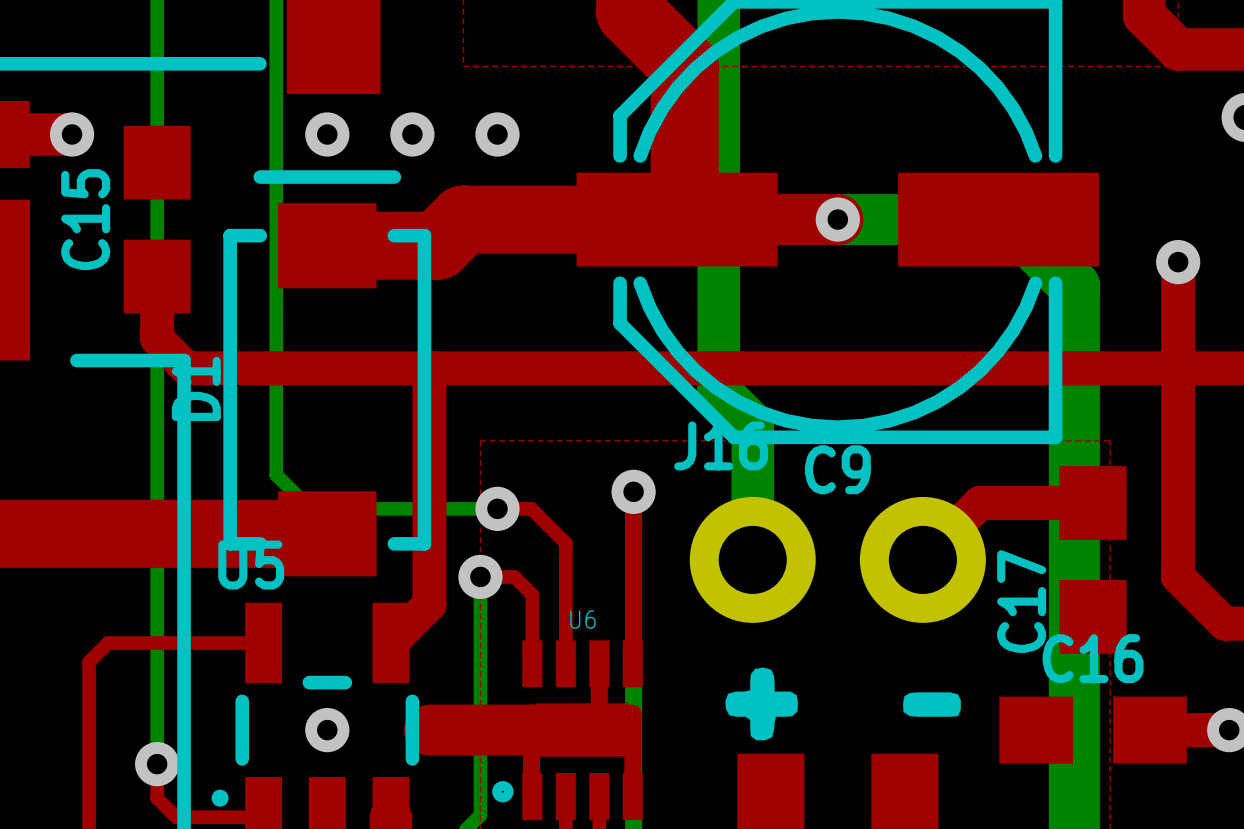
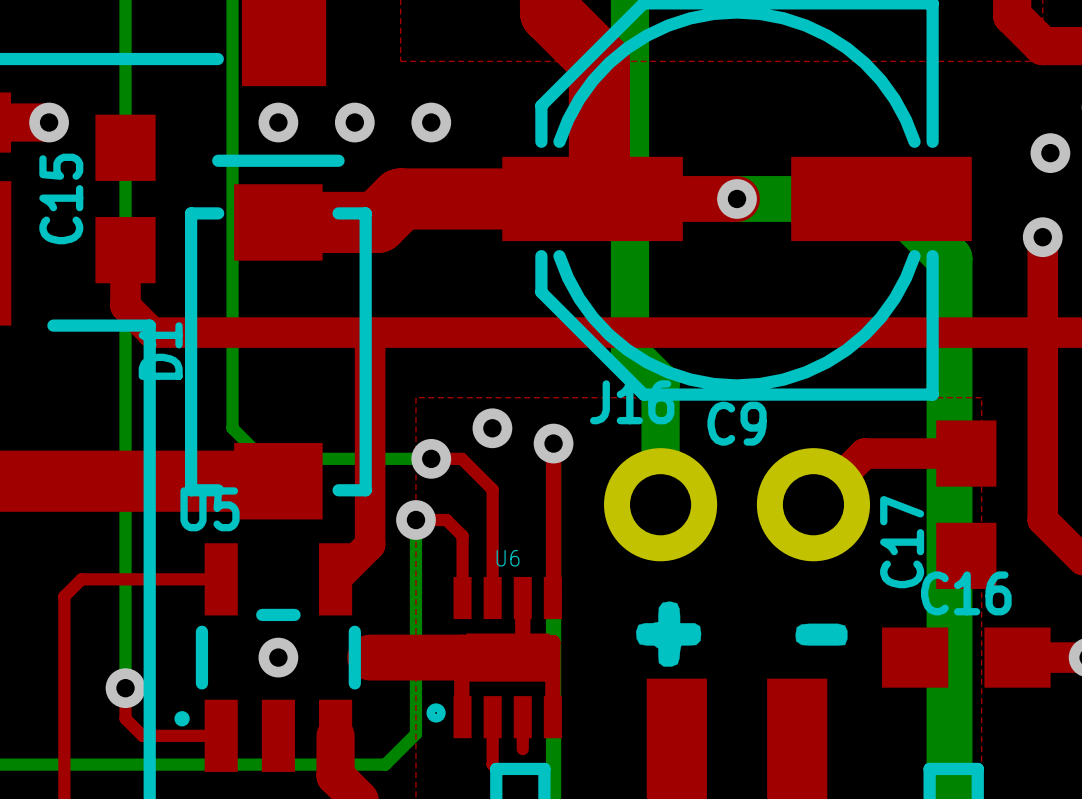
via: none -> (1050, 153)
via: none -> (492, 428)

